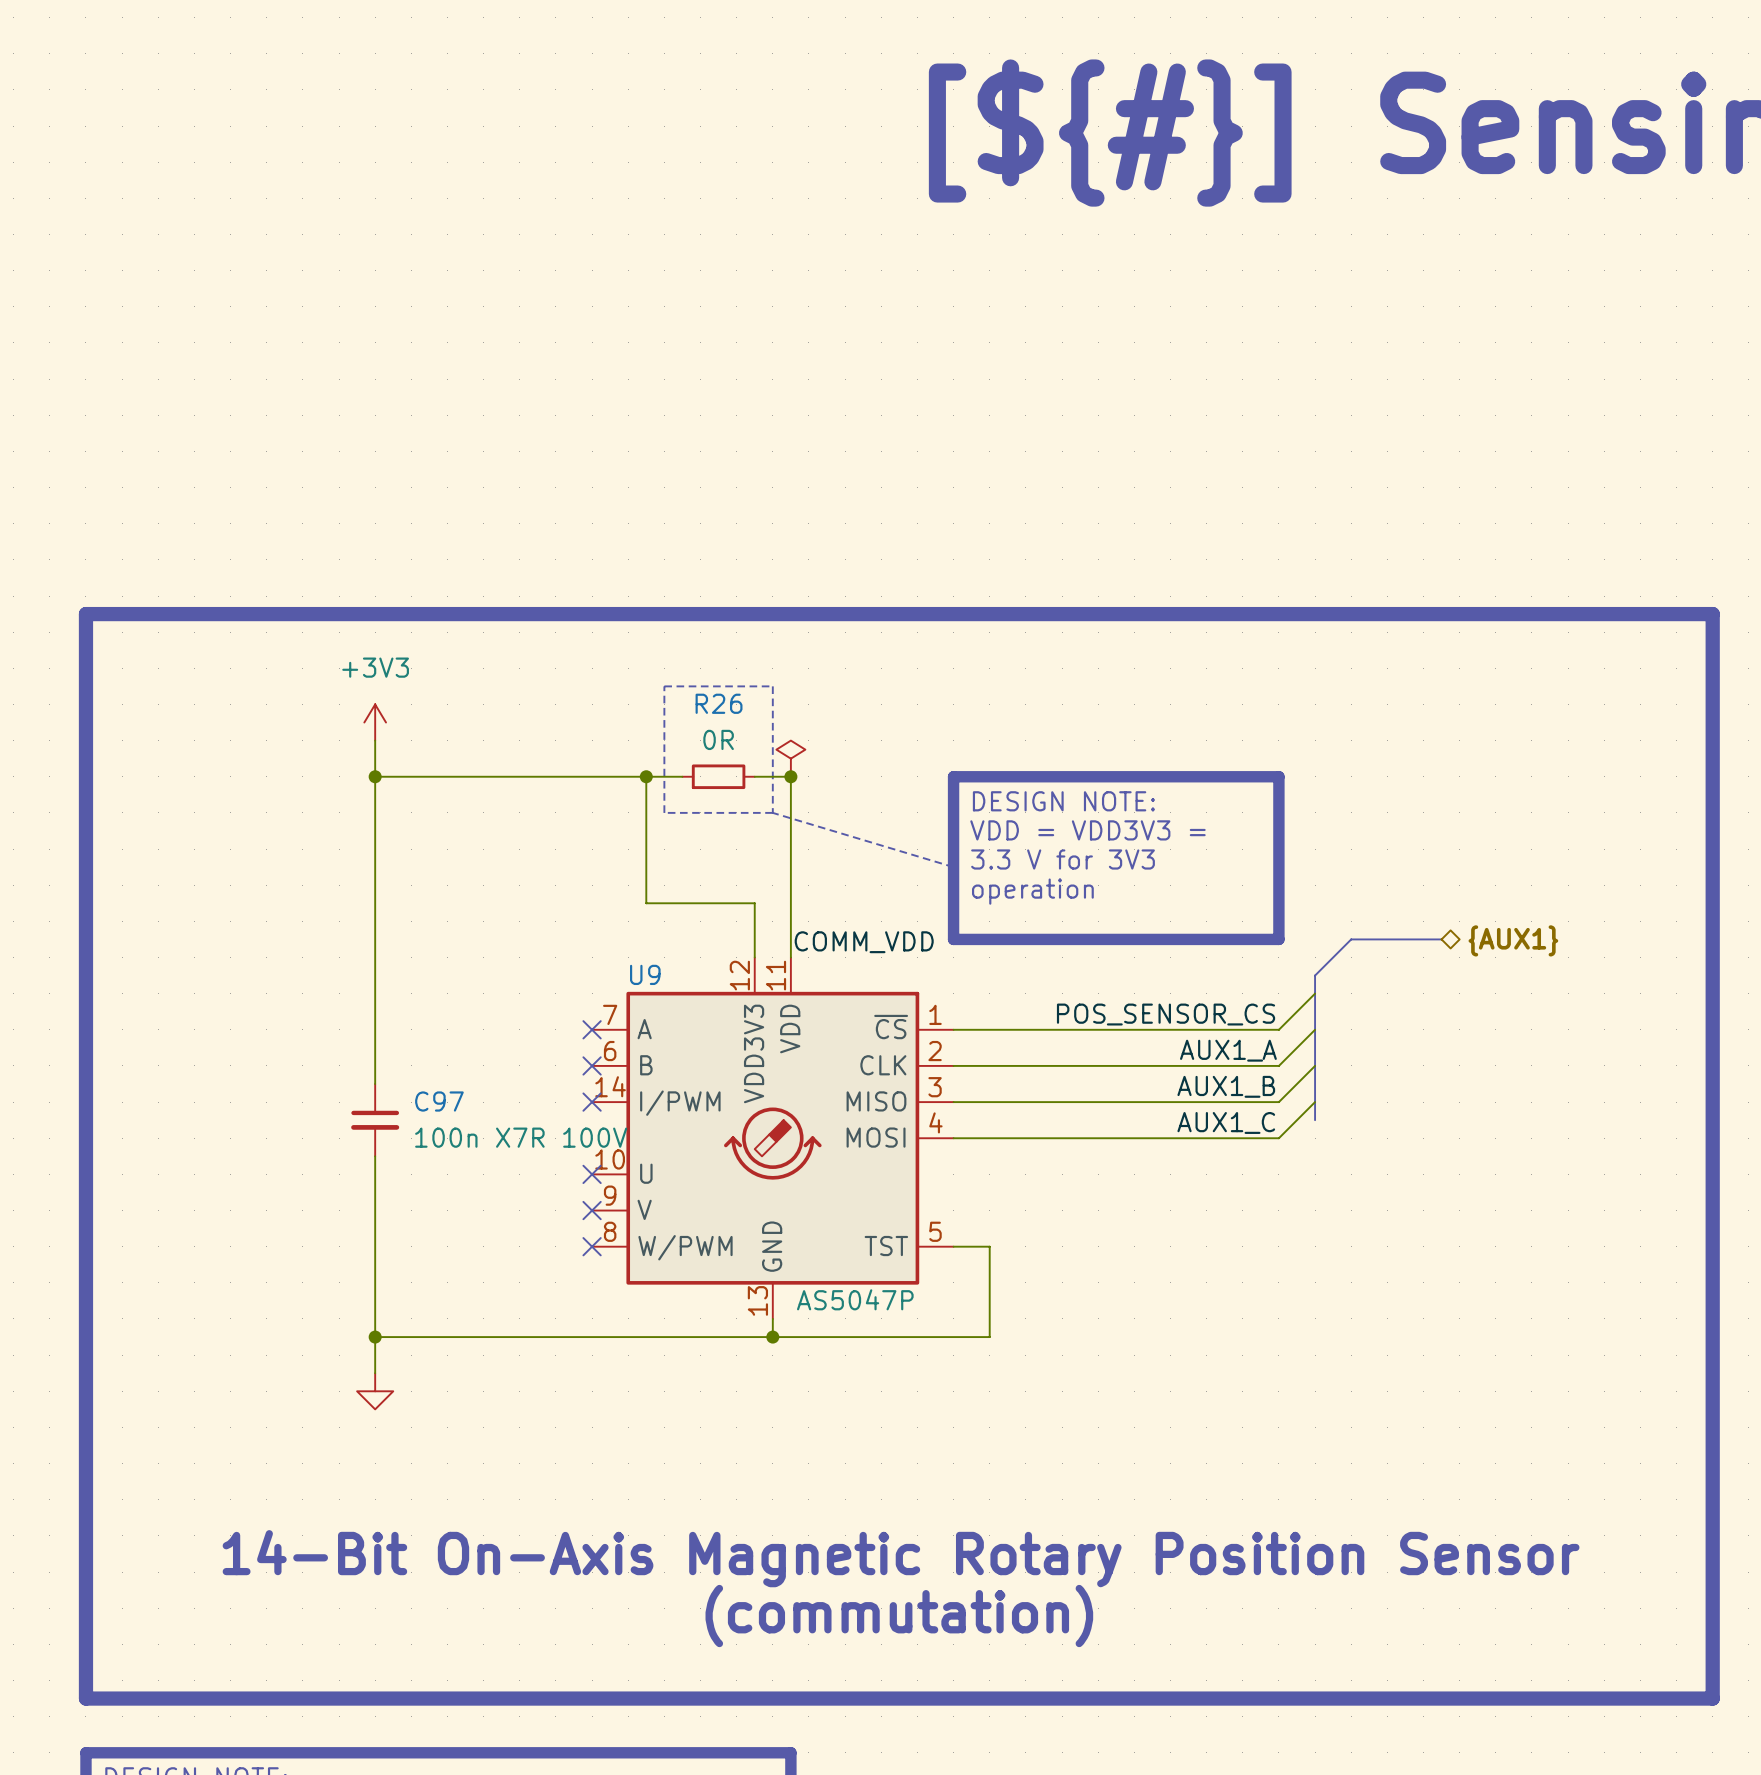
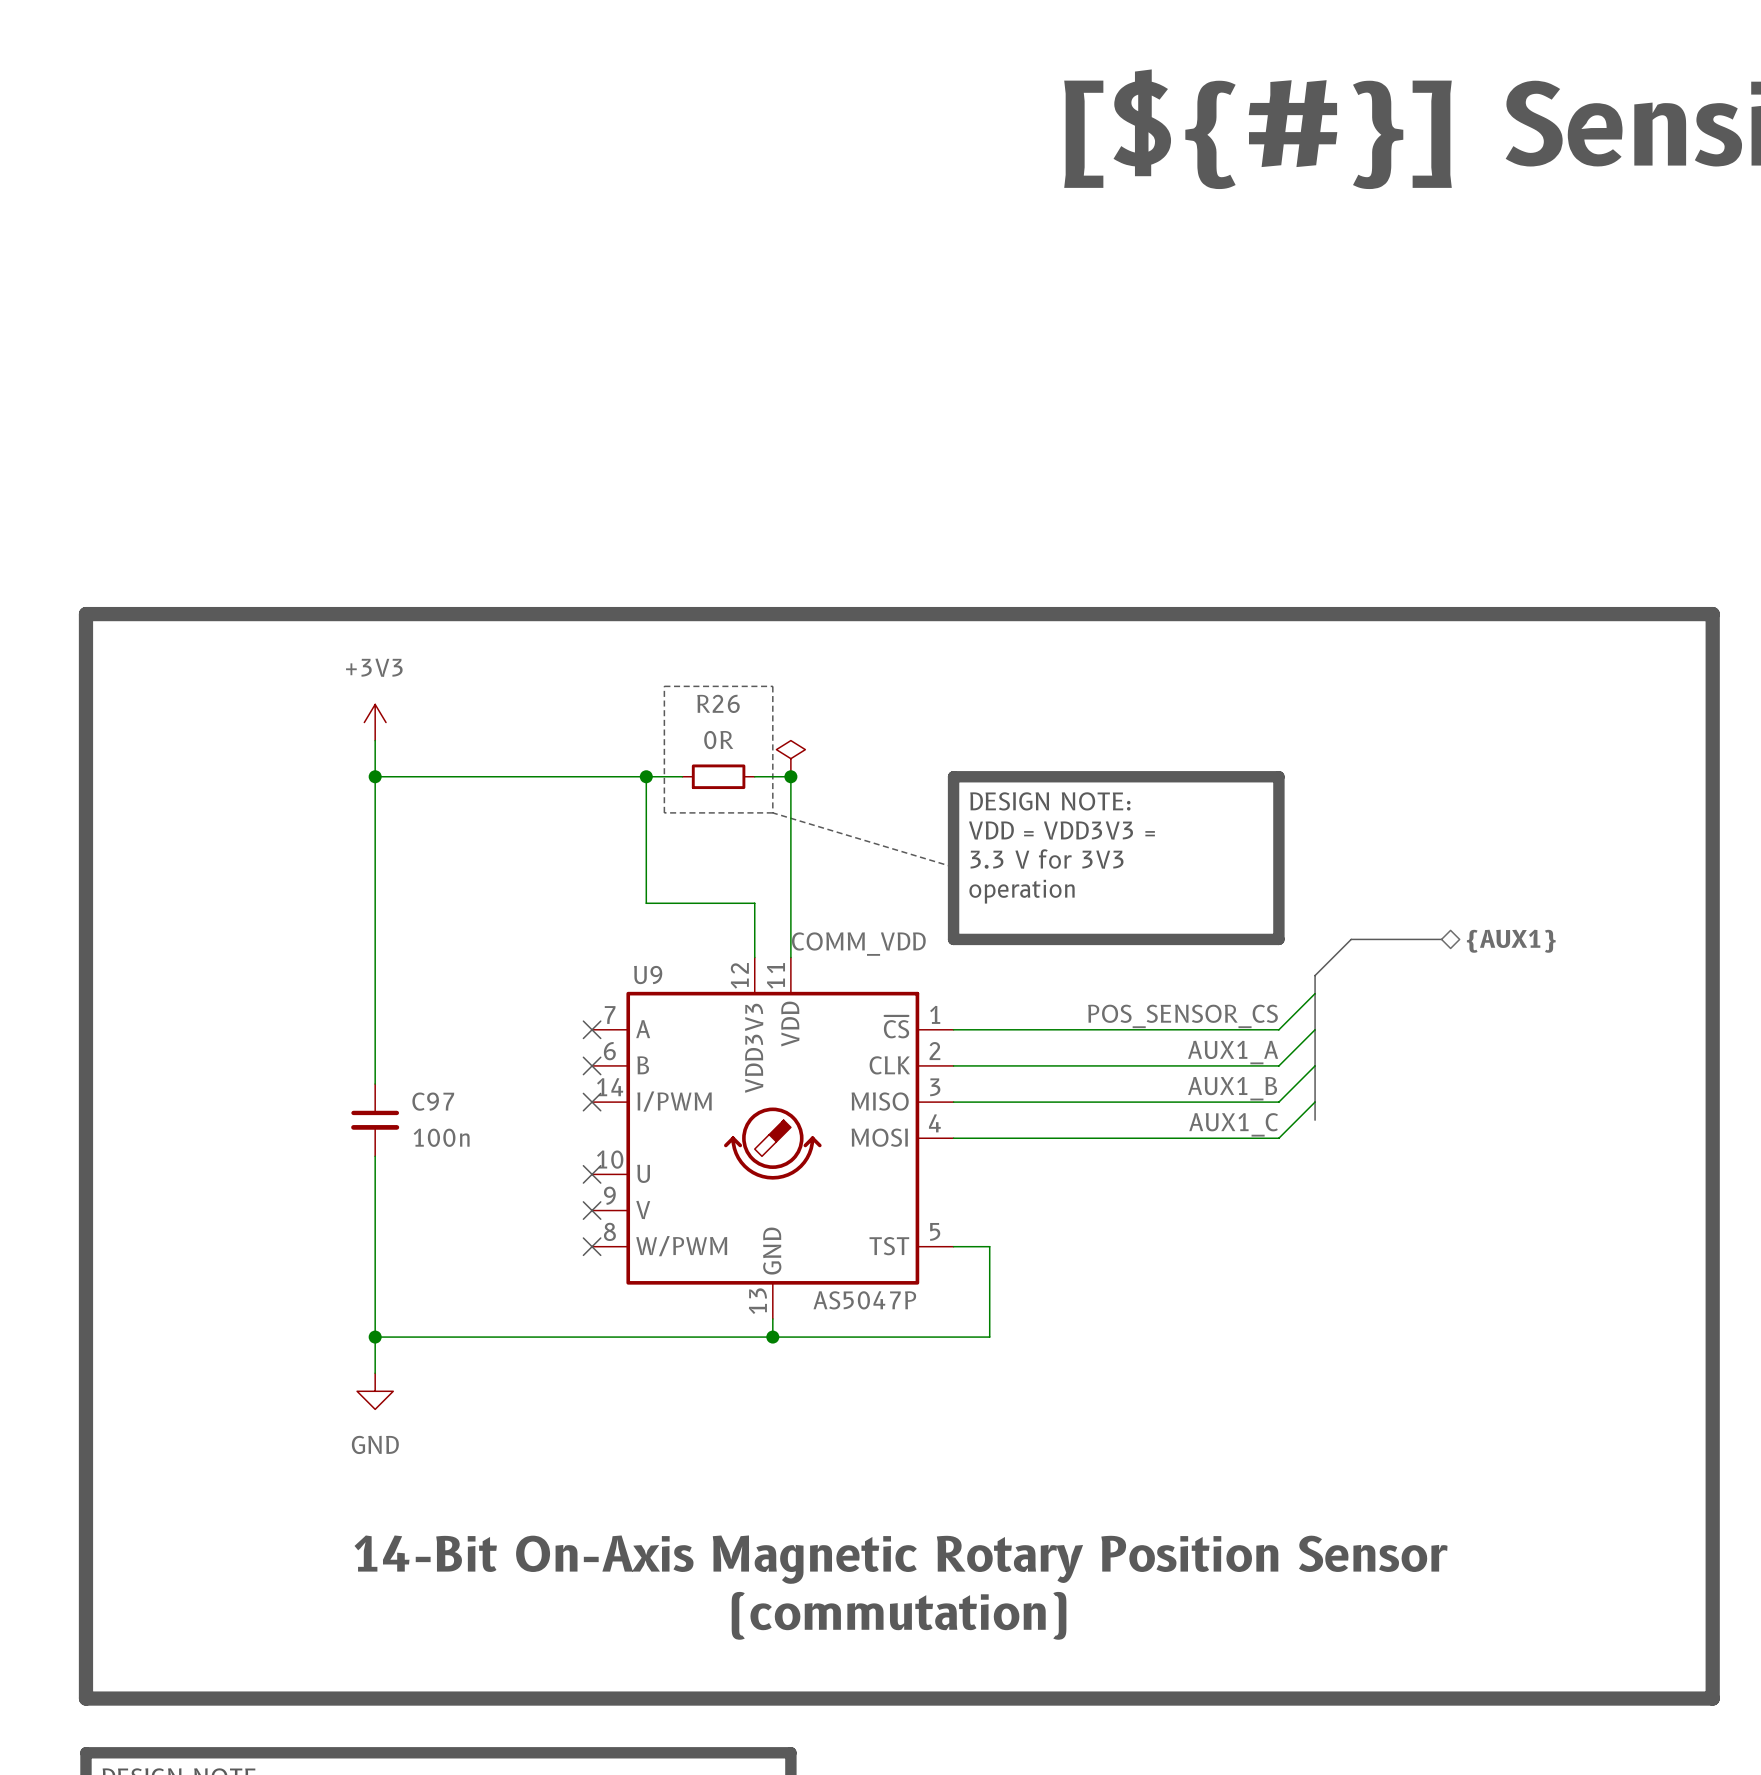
C97 value: 100n X7R 100V (521, 1137) -> 100n (441, 1137)
power symbol text: none -> GND (375, 1444)

